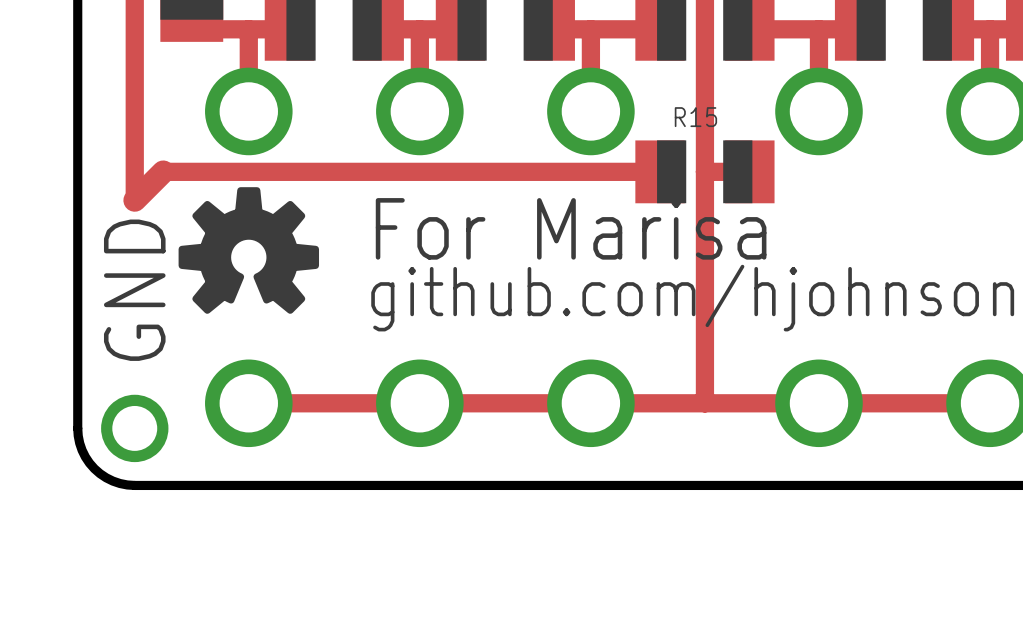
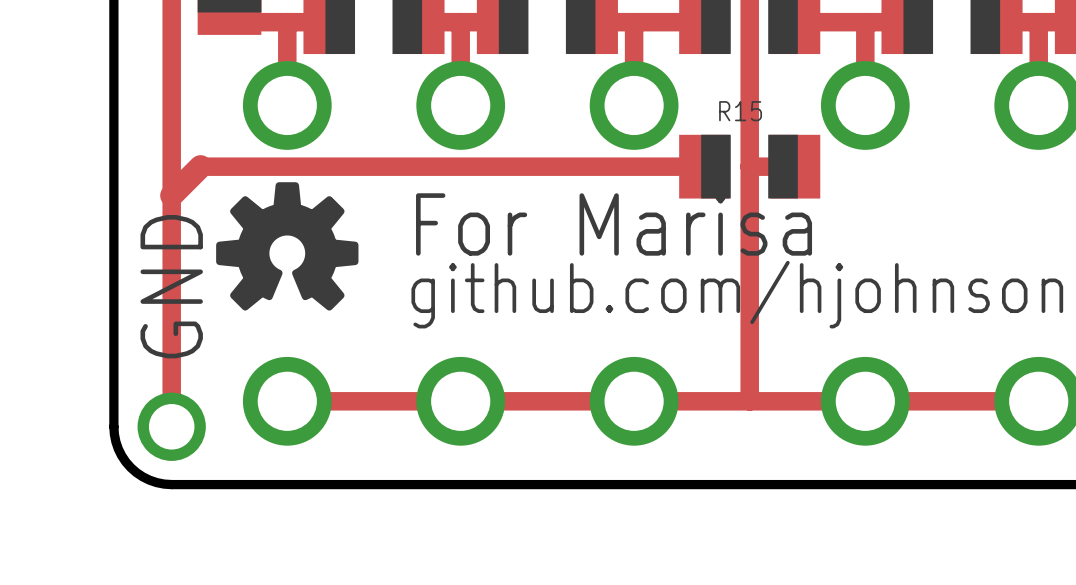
top track: none -> (171, 195) (171, 426)

